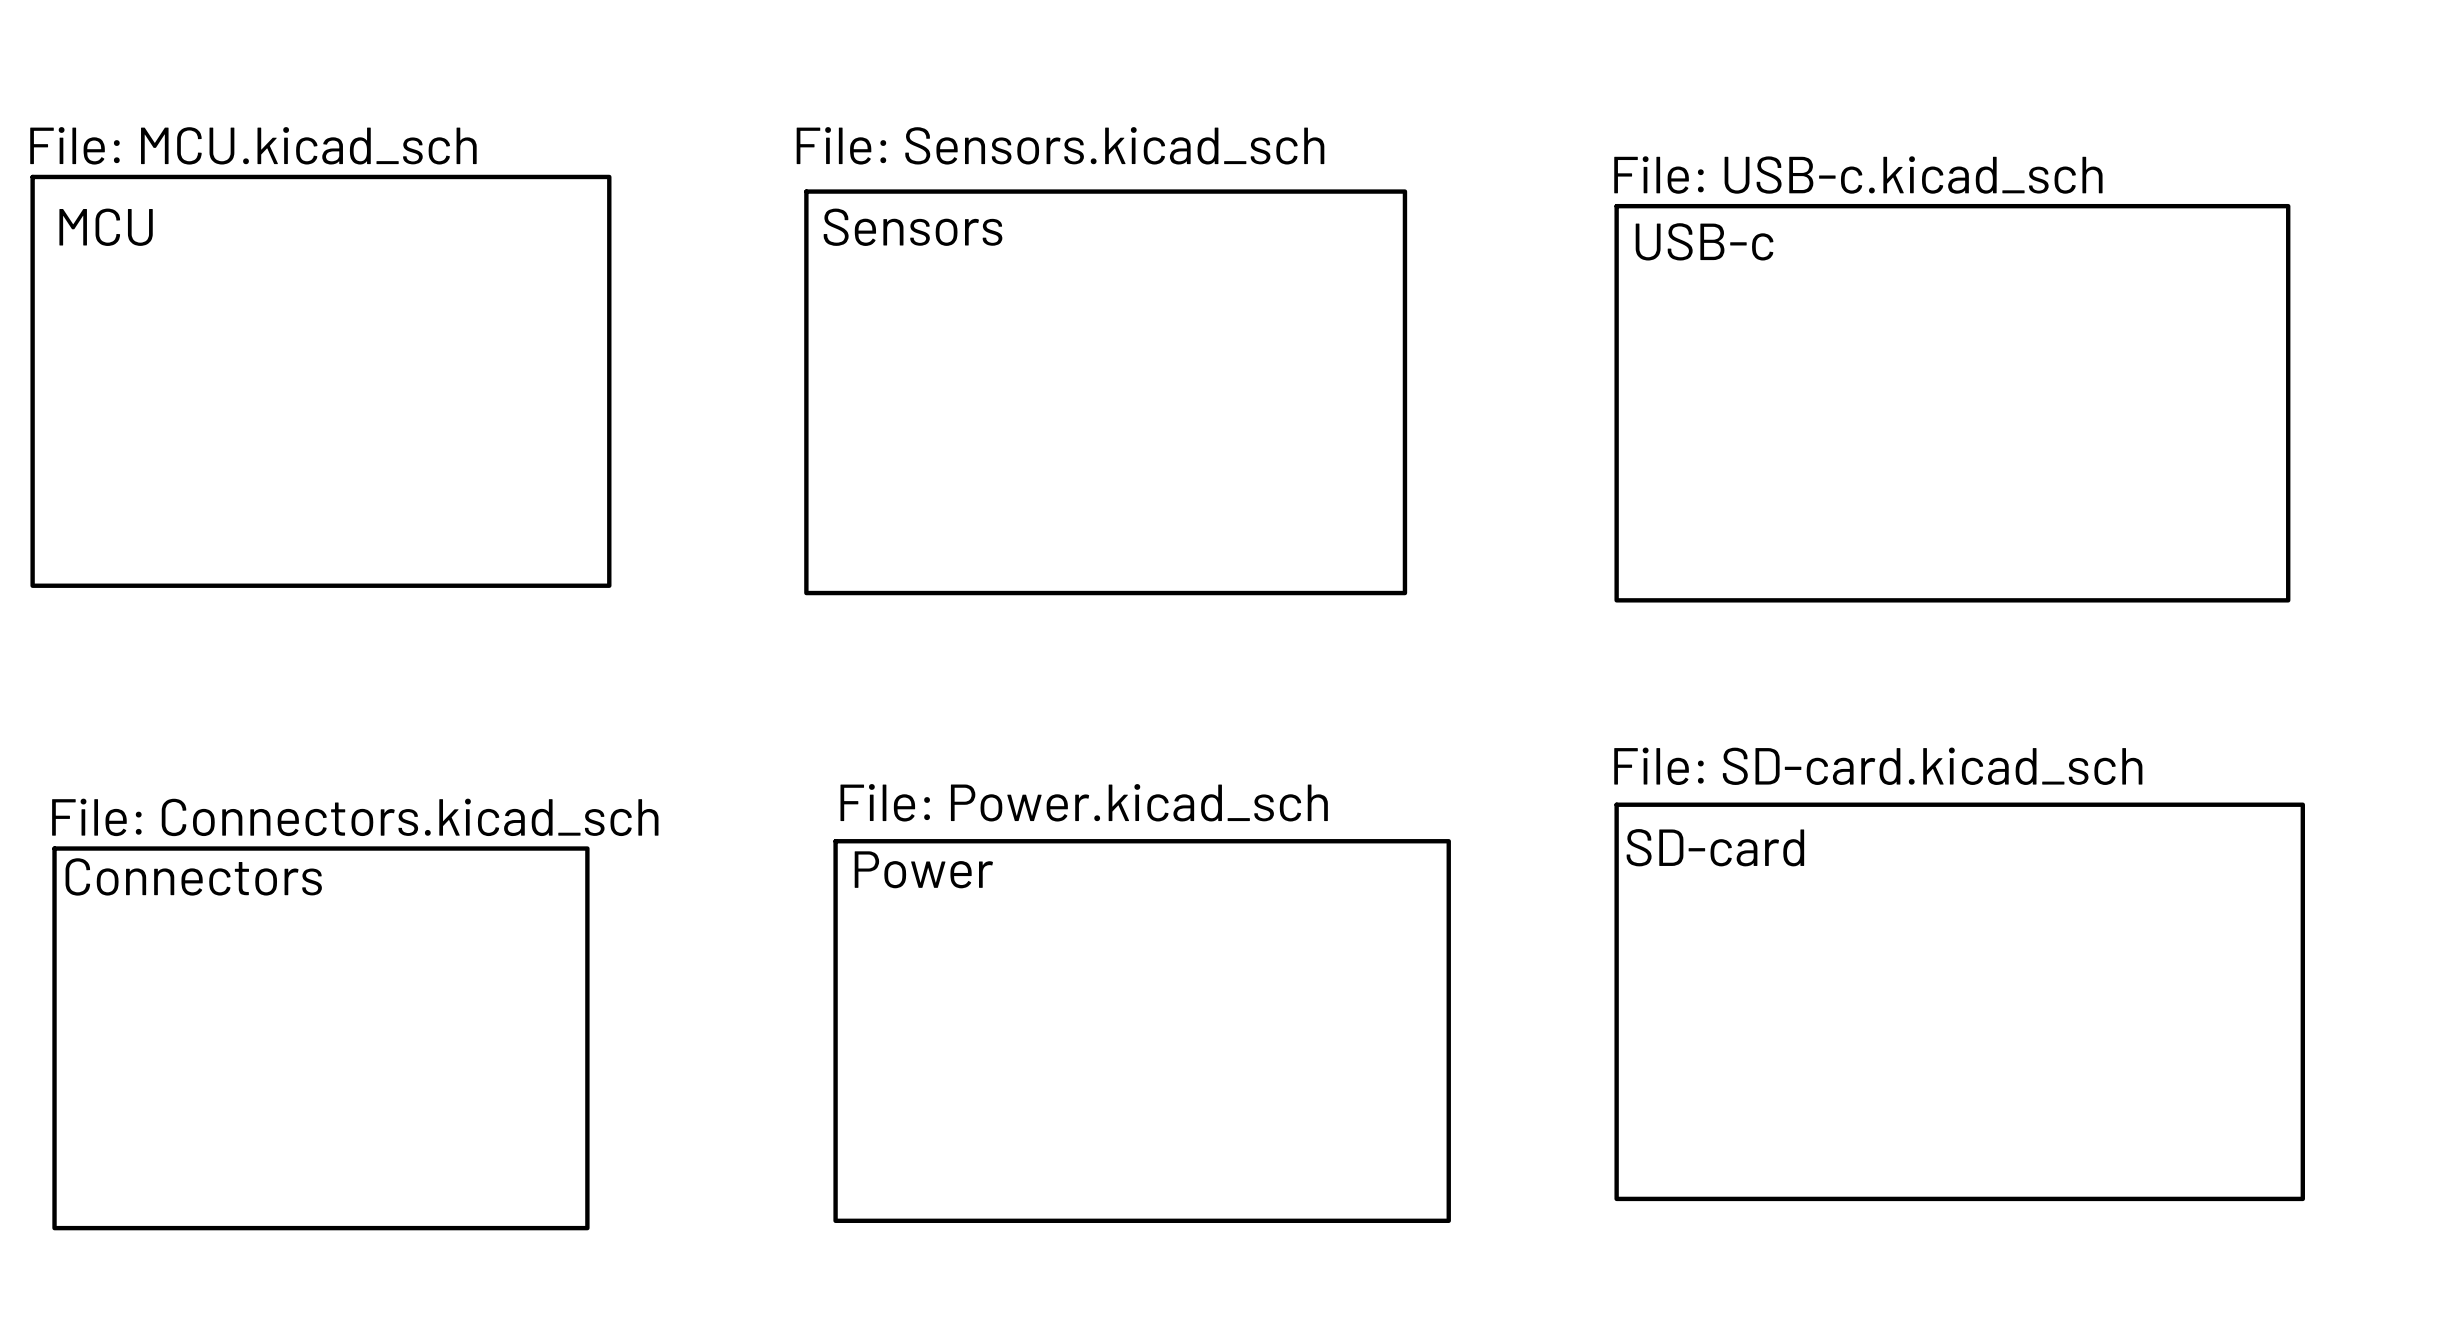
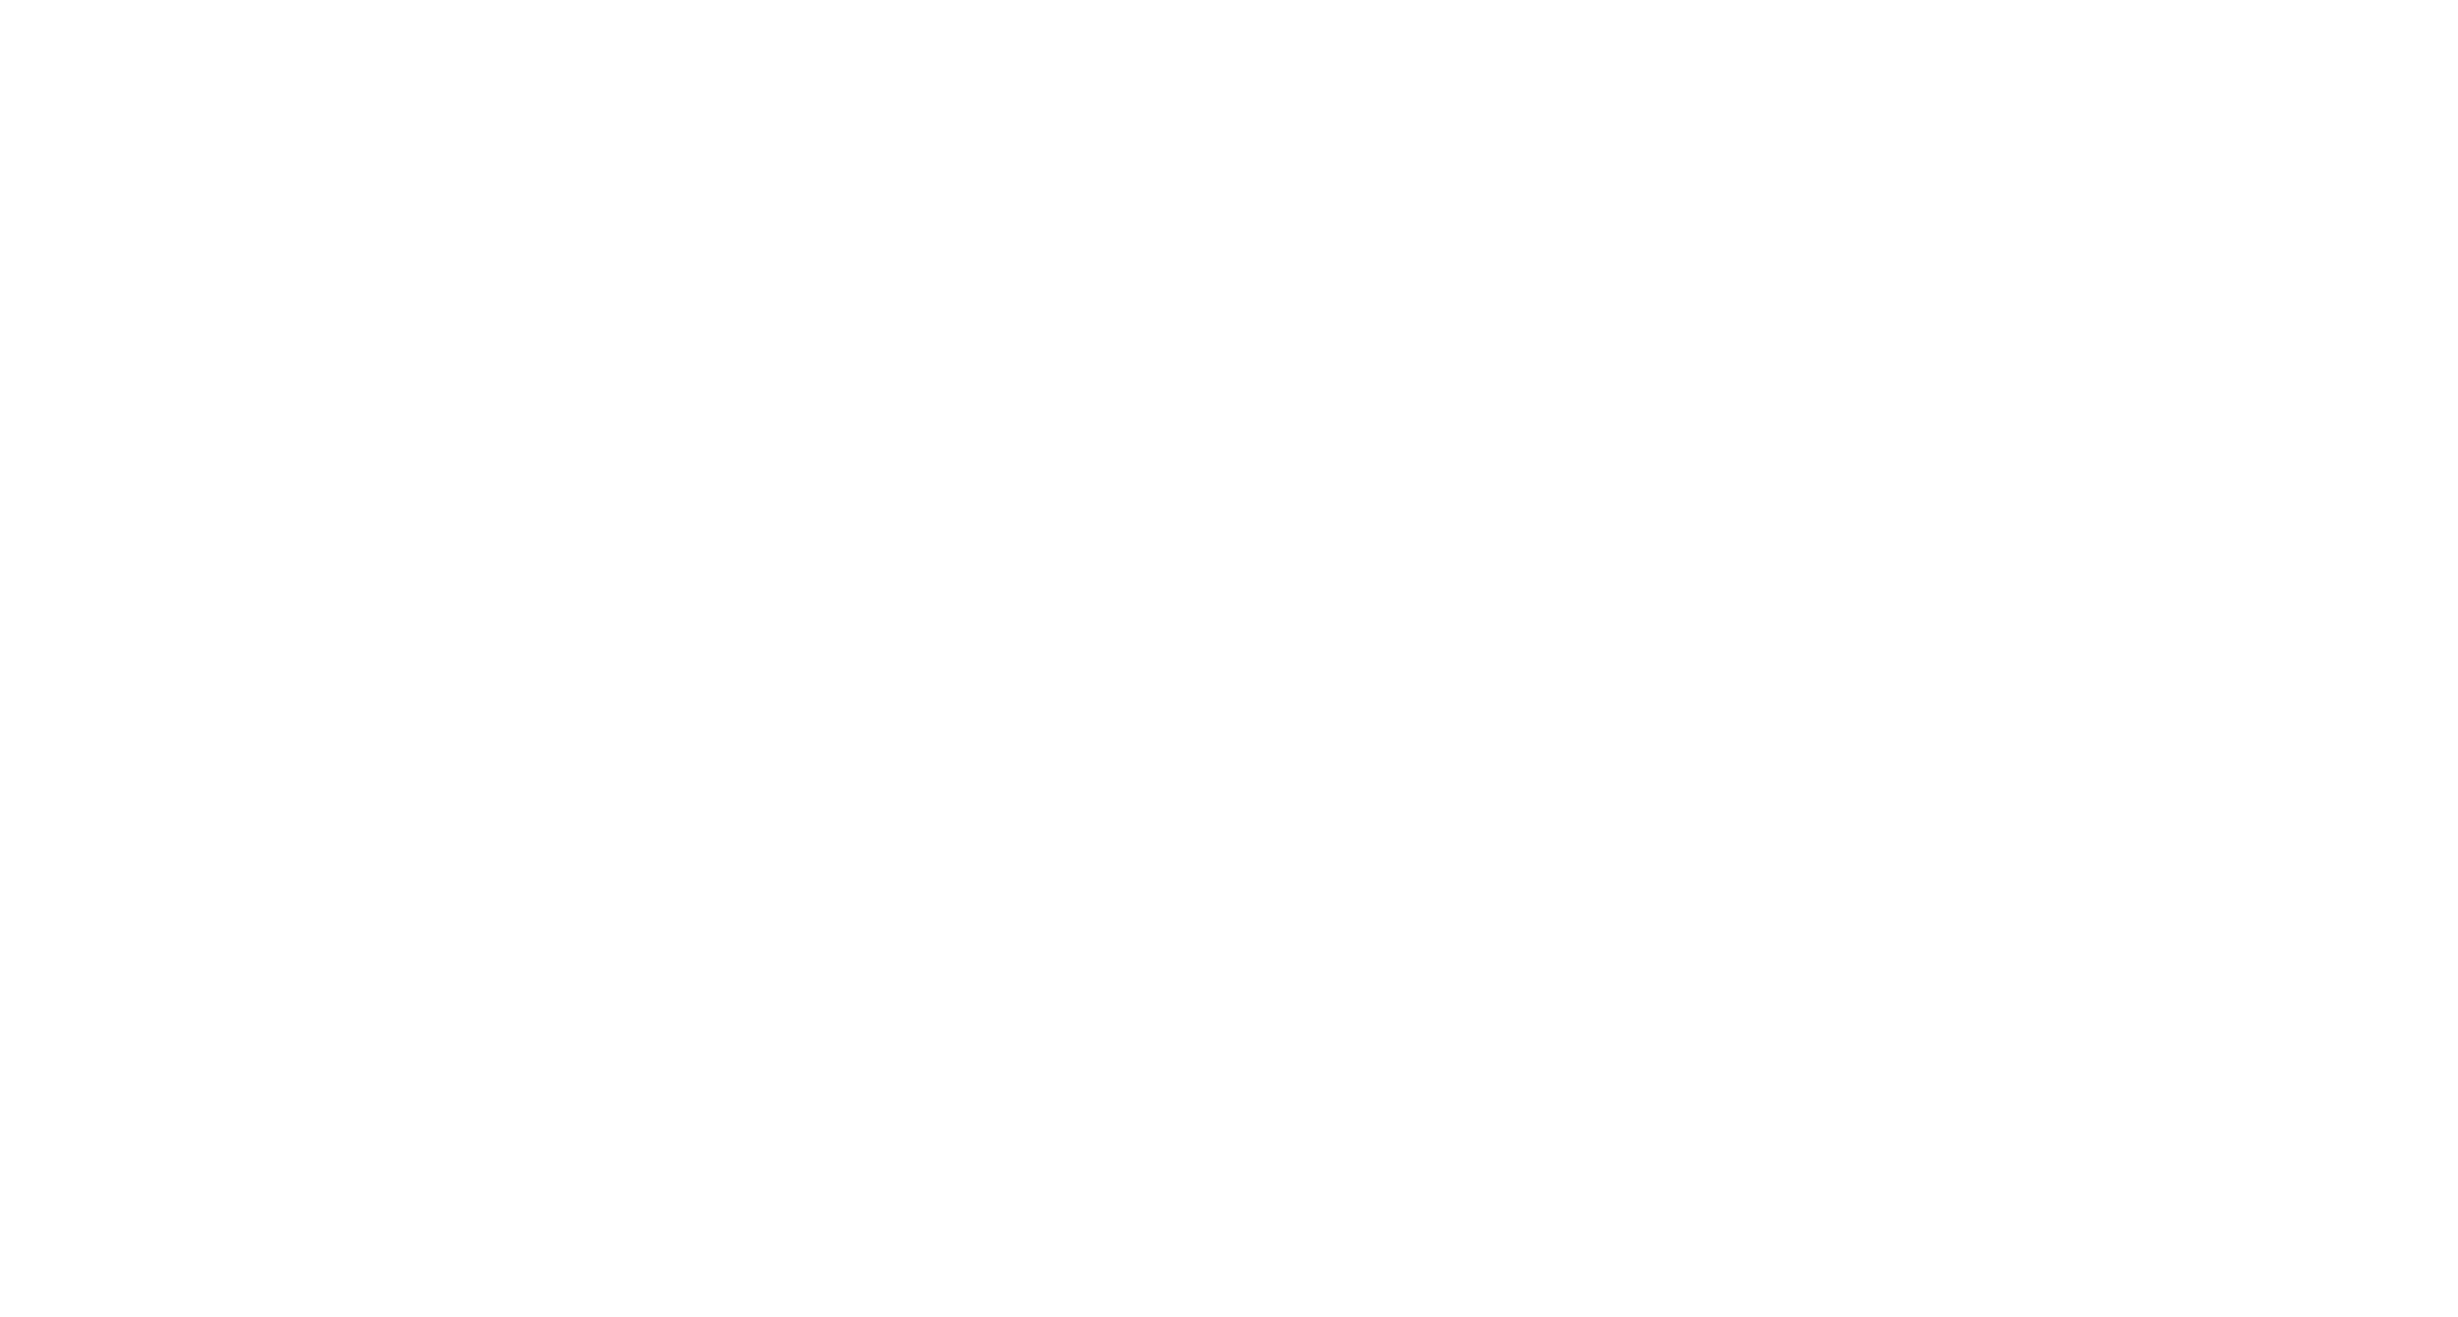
sheet MCU: File: MCU.kicad_sch (320, 381) -> none
sheet Sensors: File: Sensors.kicad_sch (1105, 392) -> none
sheet USB-c: File: USB-c.kicad_sch (1952, 403) -> none
sheet SD-card: File: SD-card.kicad_sch (1959, 1001) -> none
sheet Power: File: Power.kicad_sch (1142, 1031) -> none
sheet Connectors: File: Connectors.kicad_sch (320, 1038) -> none

